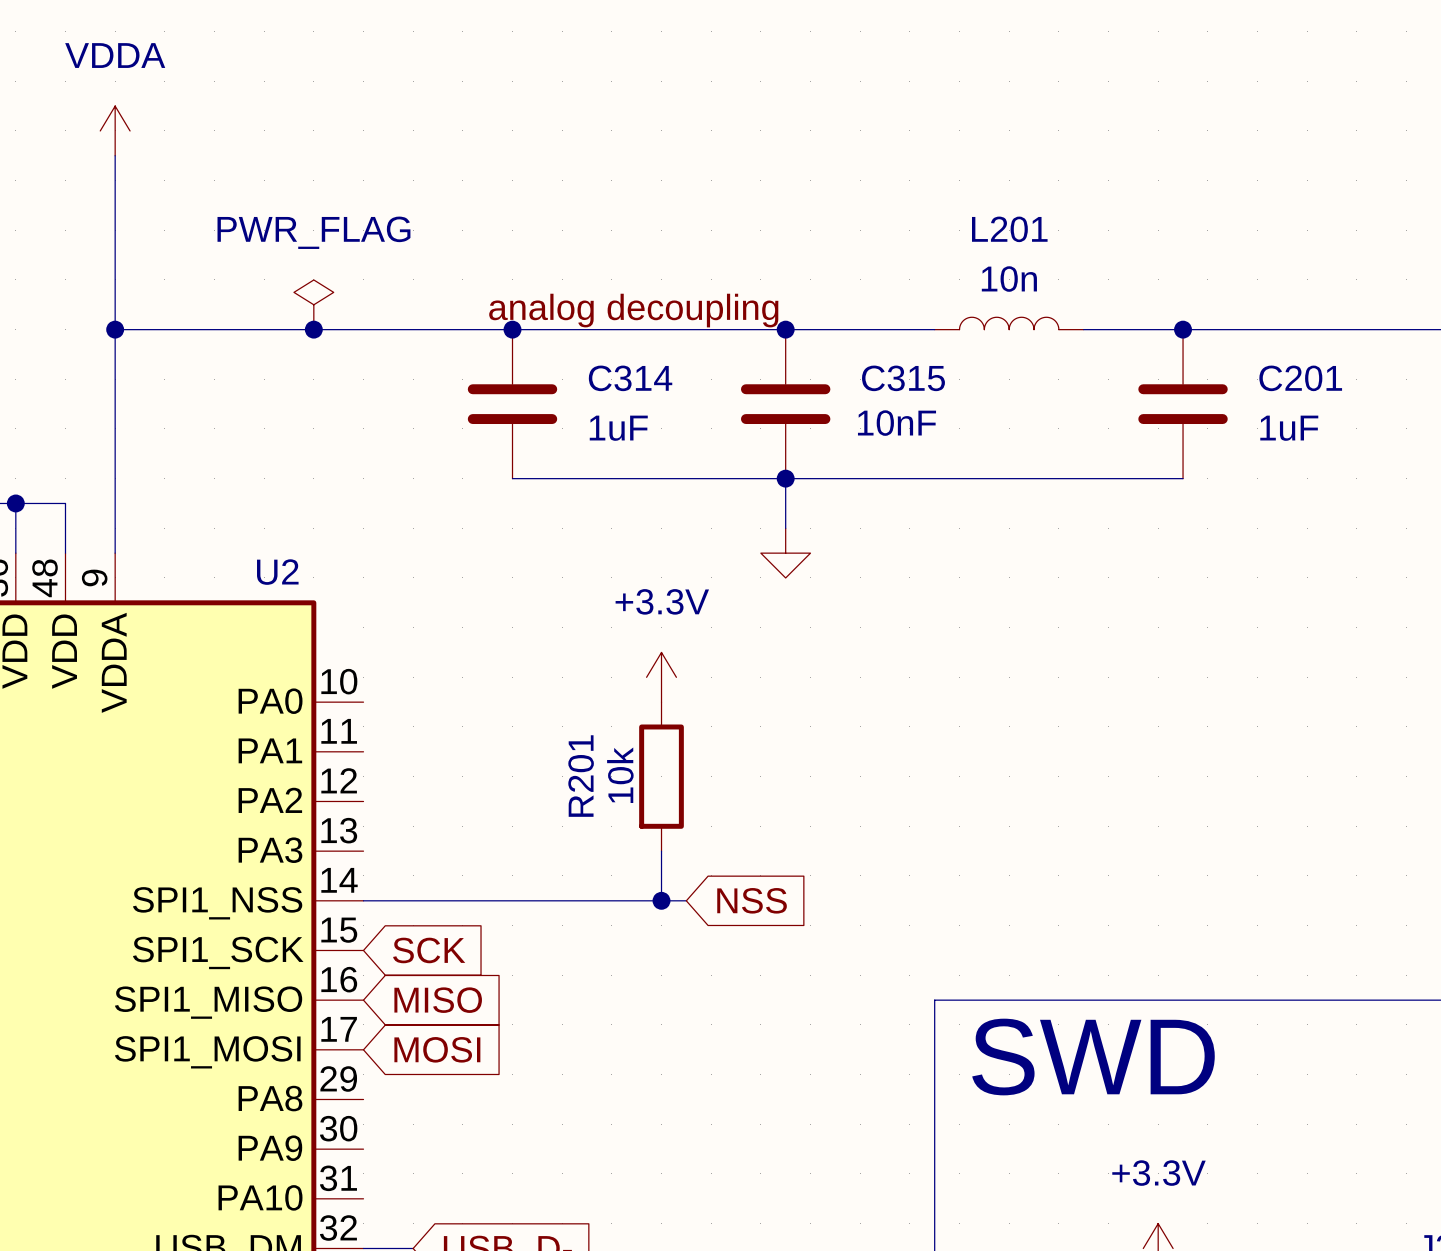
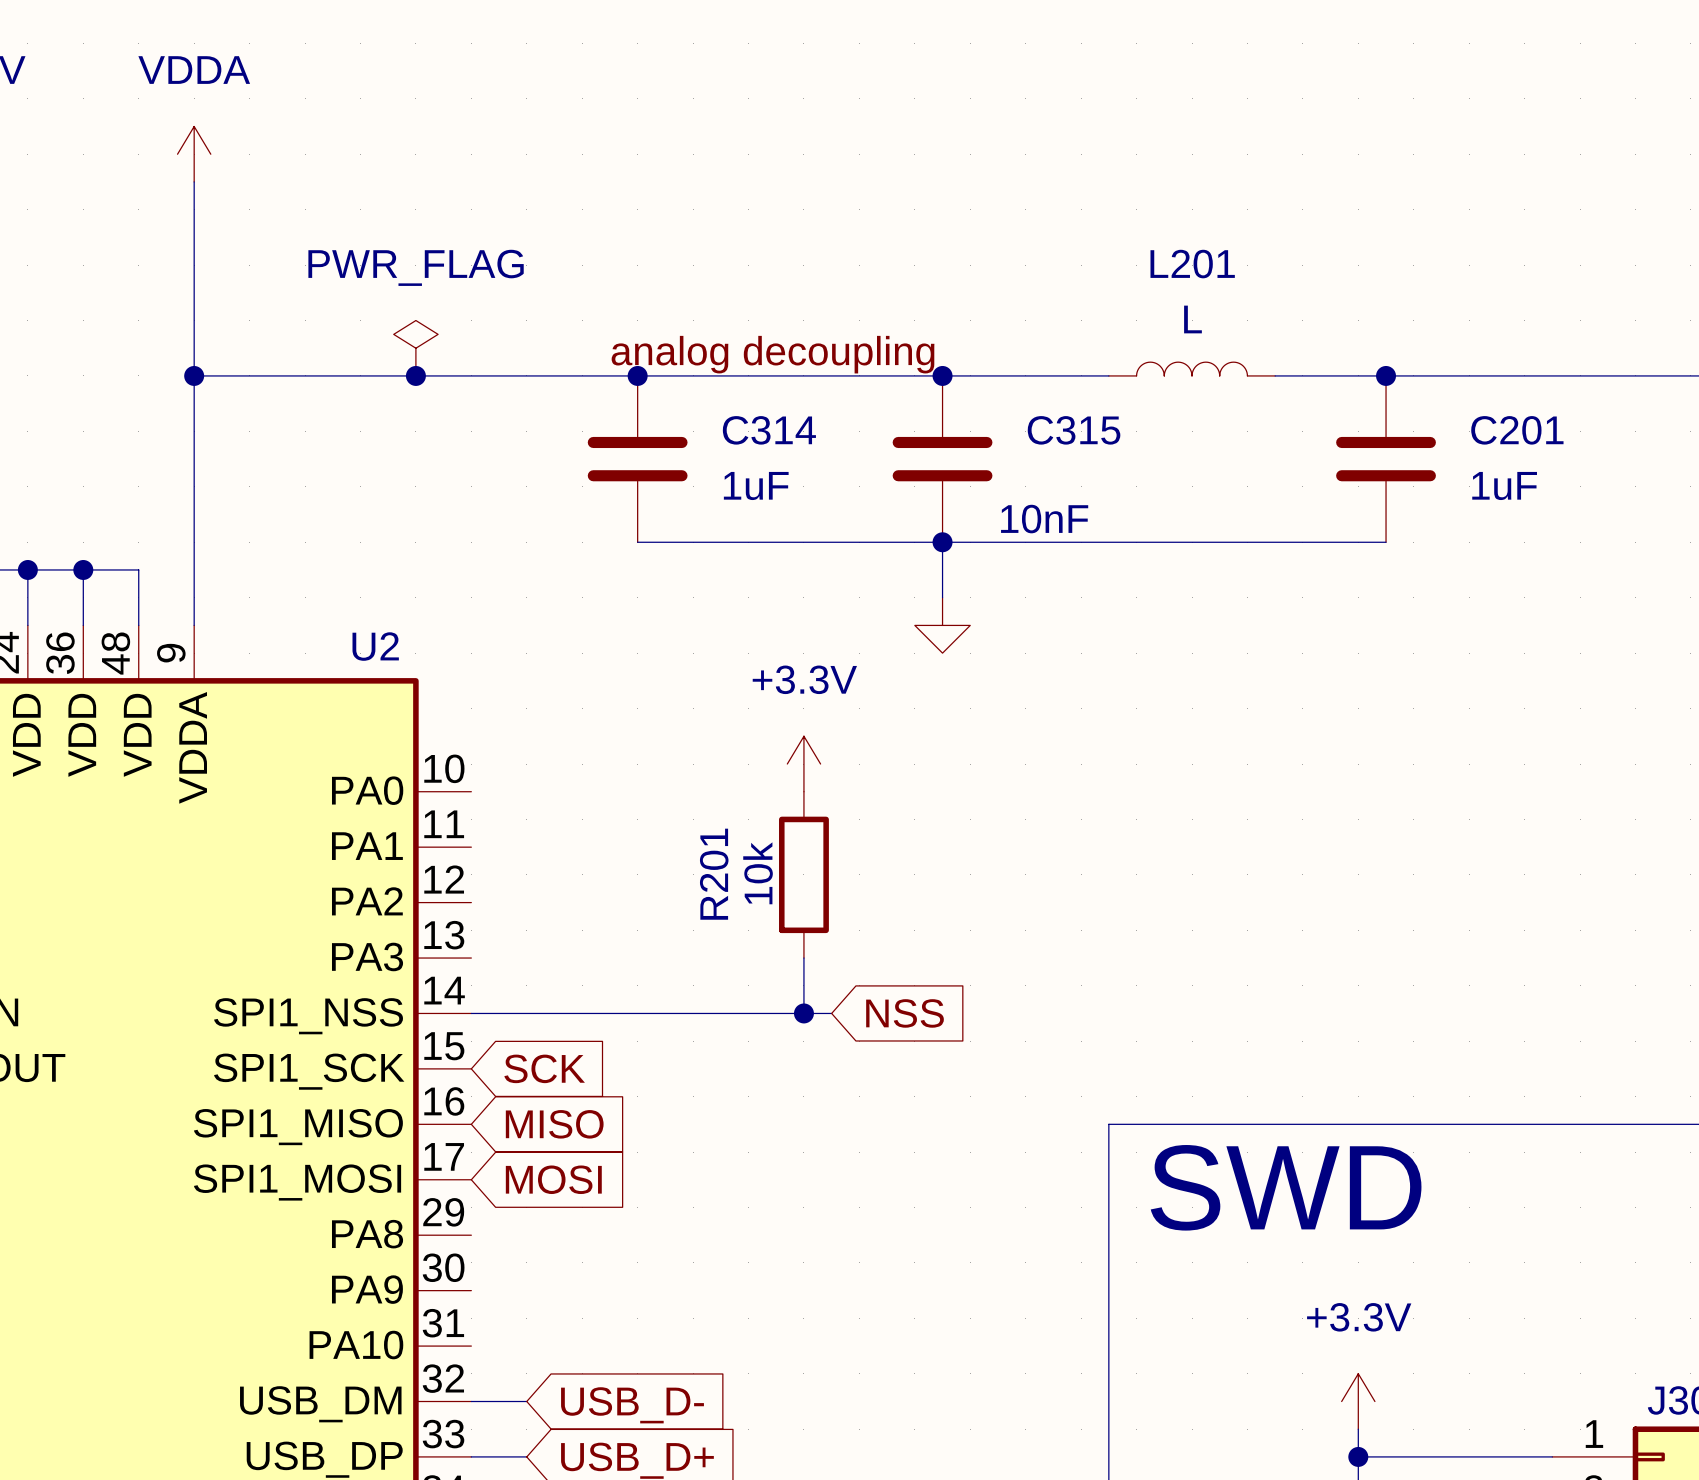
L201 value: 10n (1009, 279) -> L (1192, 319)
C315 value position: 10nF (897, 423) -> 10nF (1044, 519)

